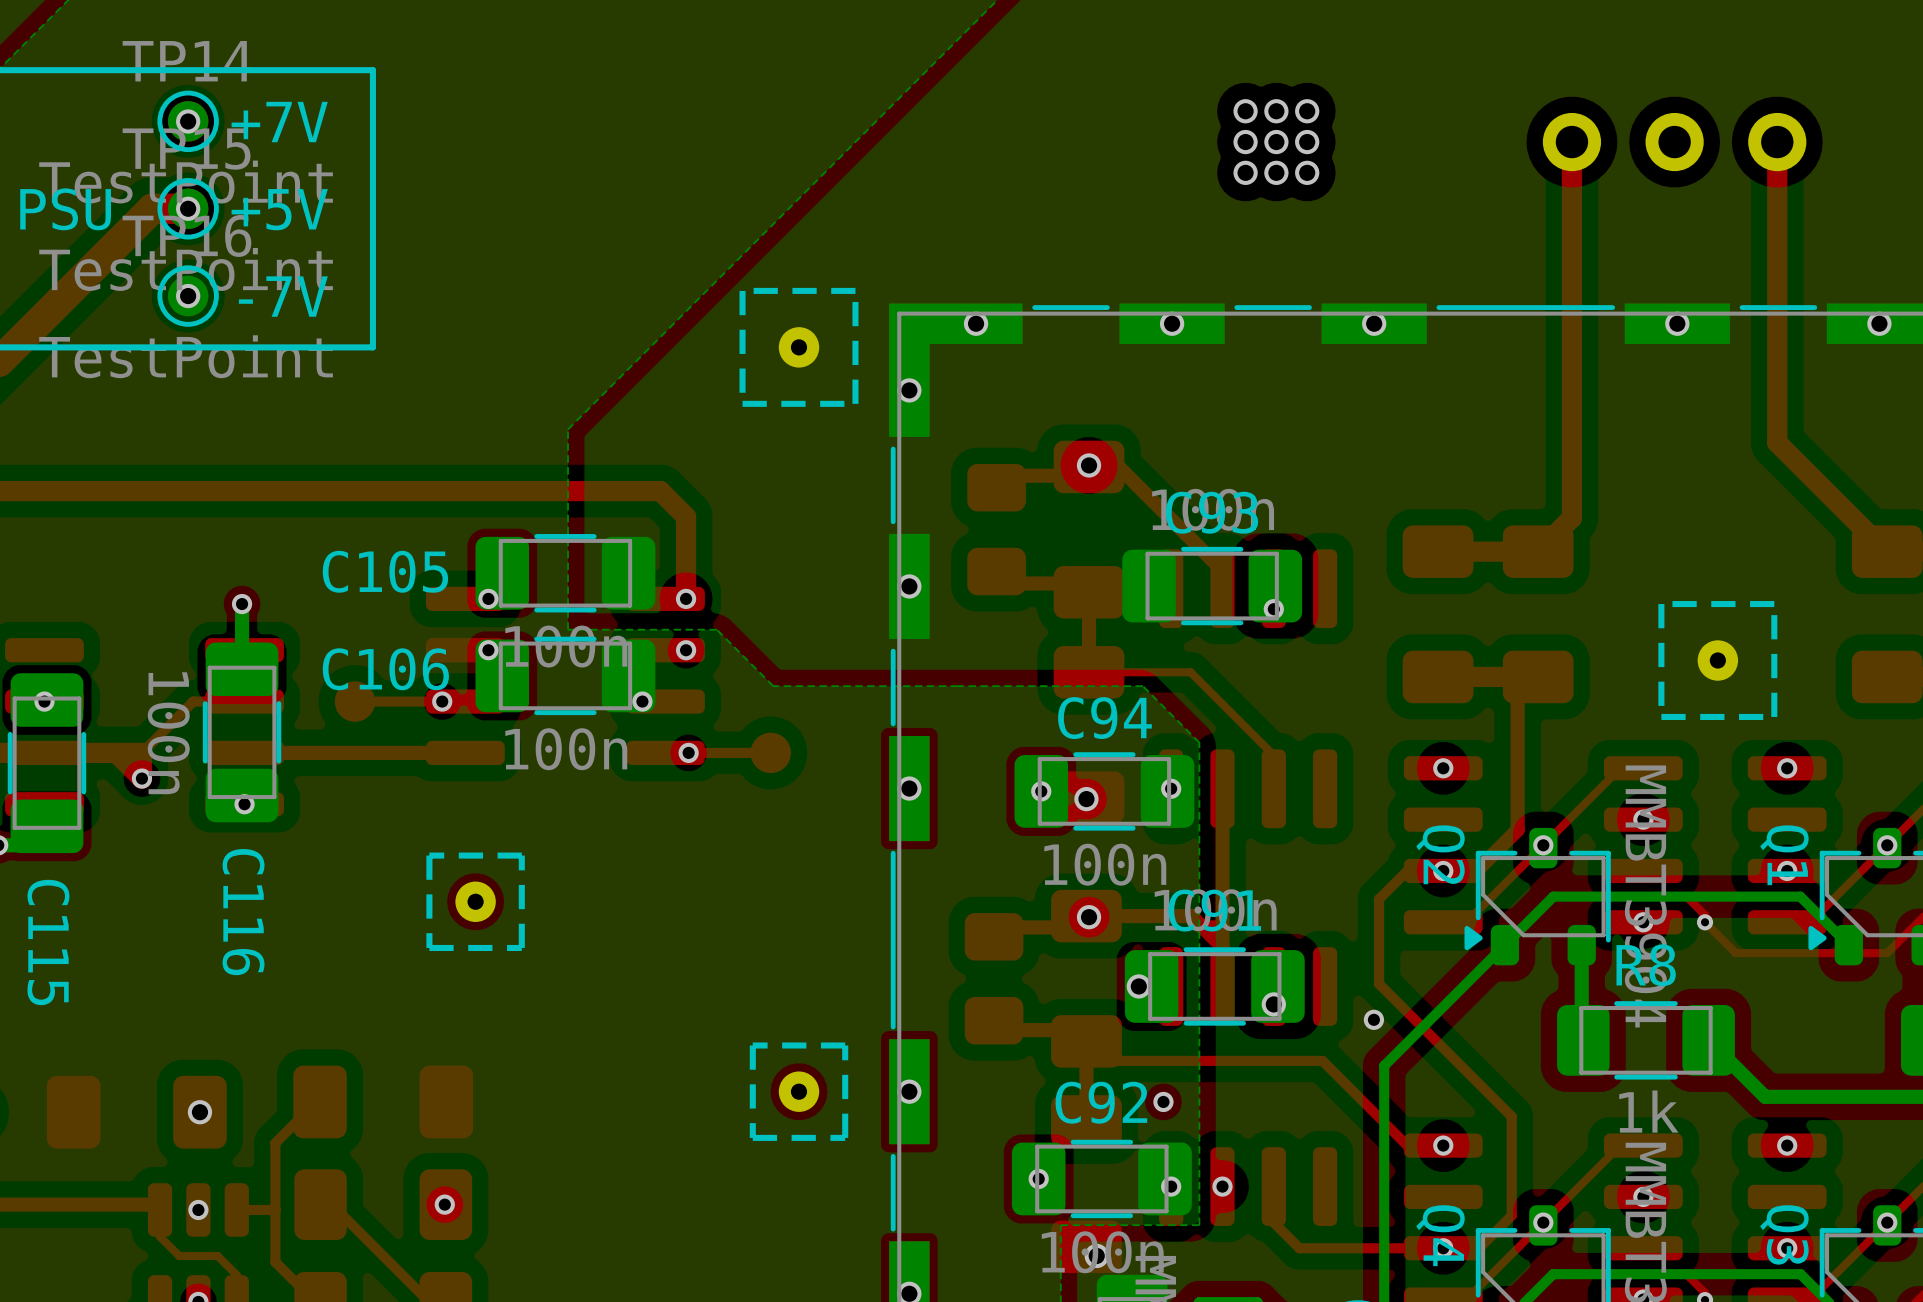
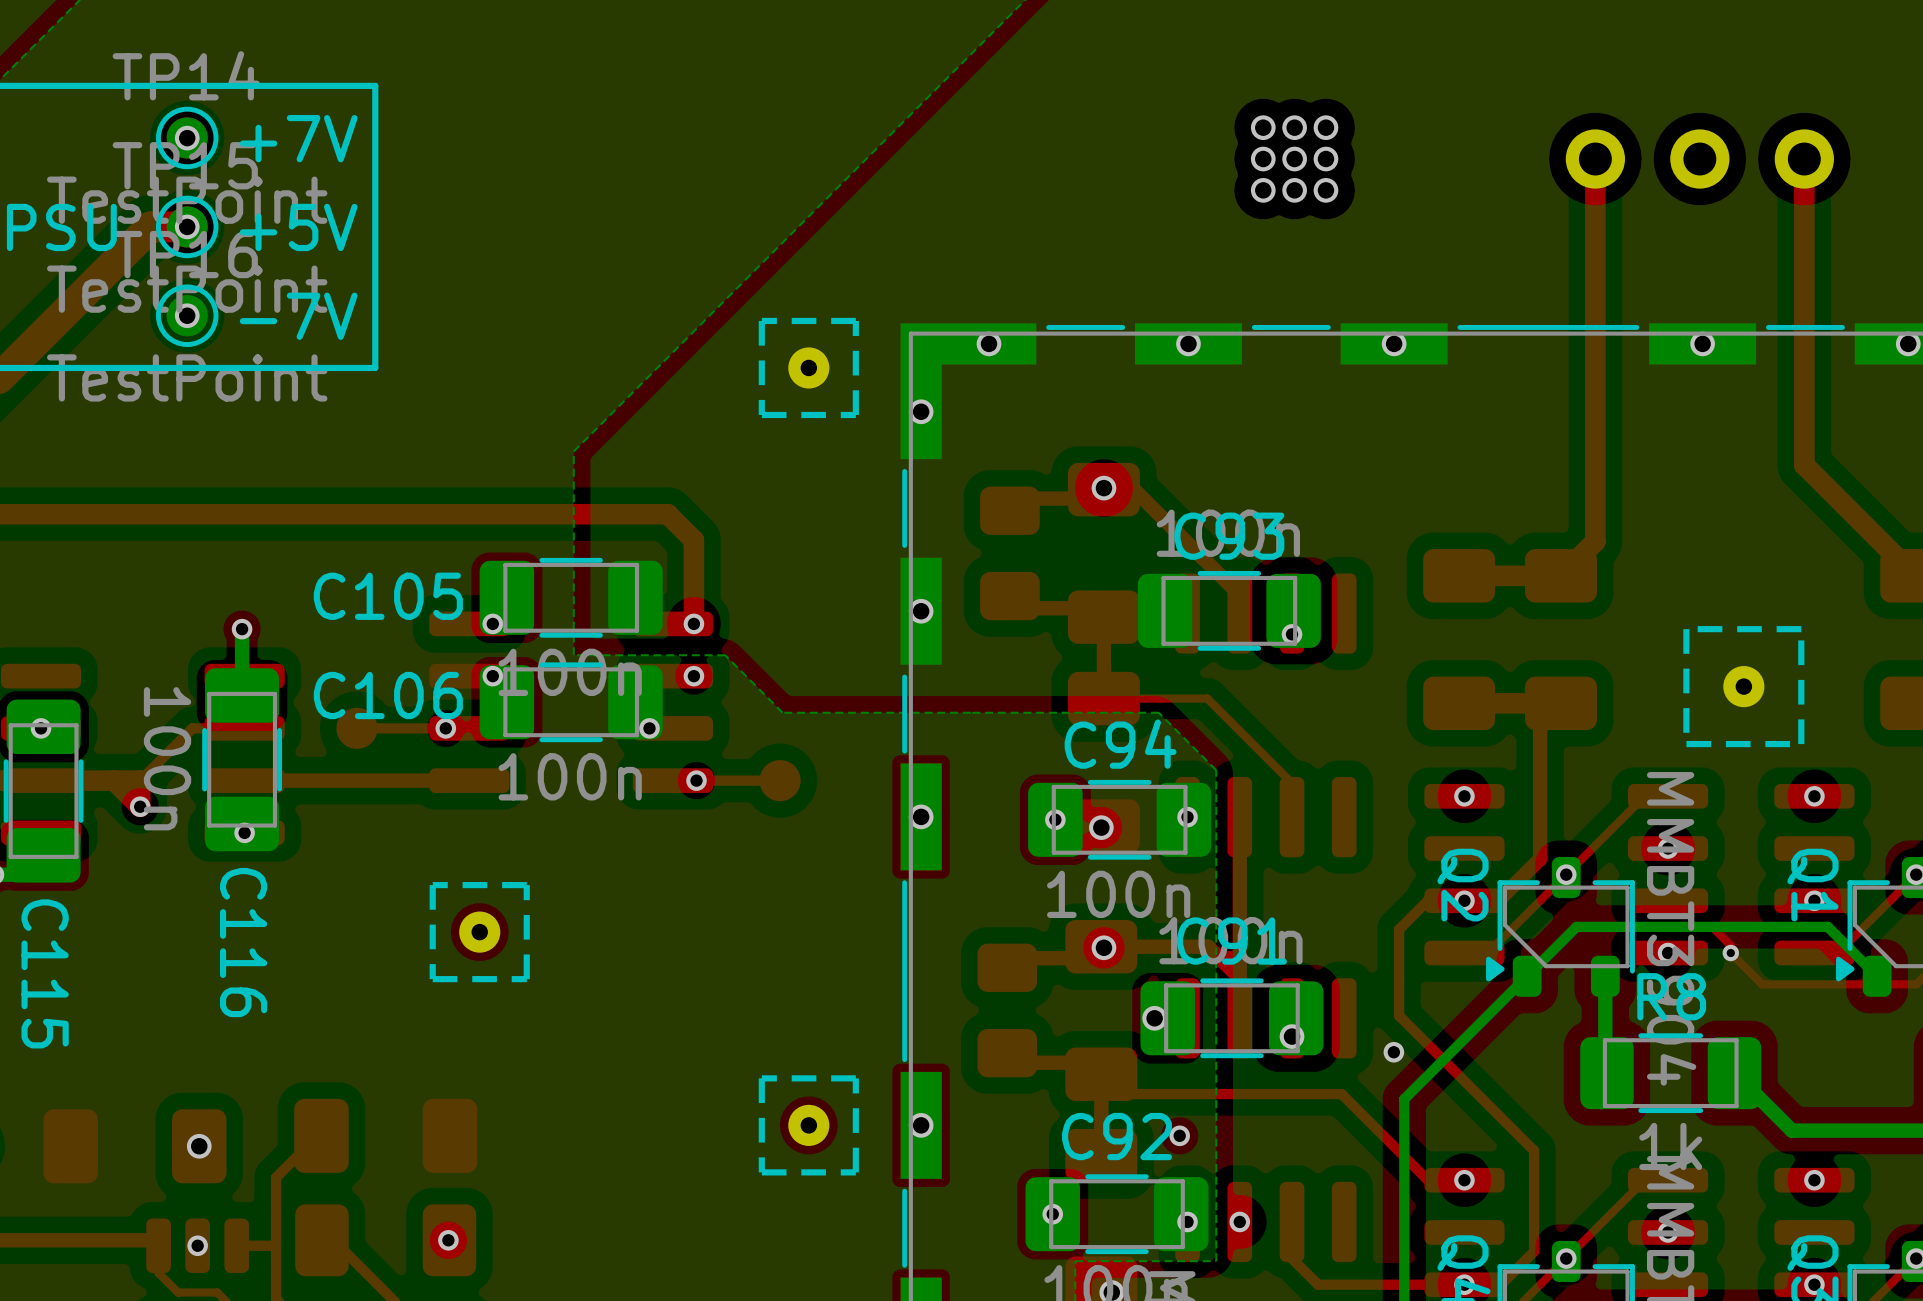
line: (855, 290) (742, 290) (742, 403) (855, 403) (855, 290) -> (855, 320) (855, 414) (761, 414) (761, 320) (855, 320)

